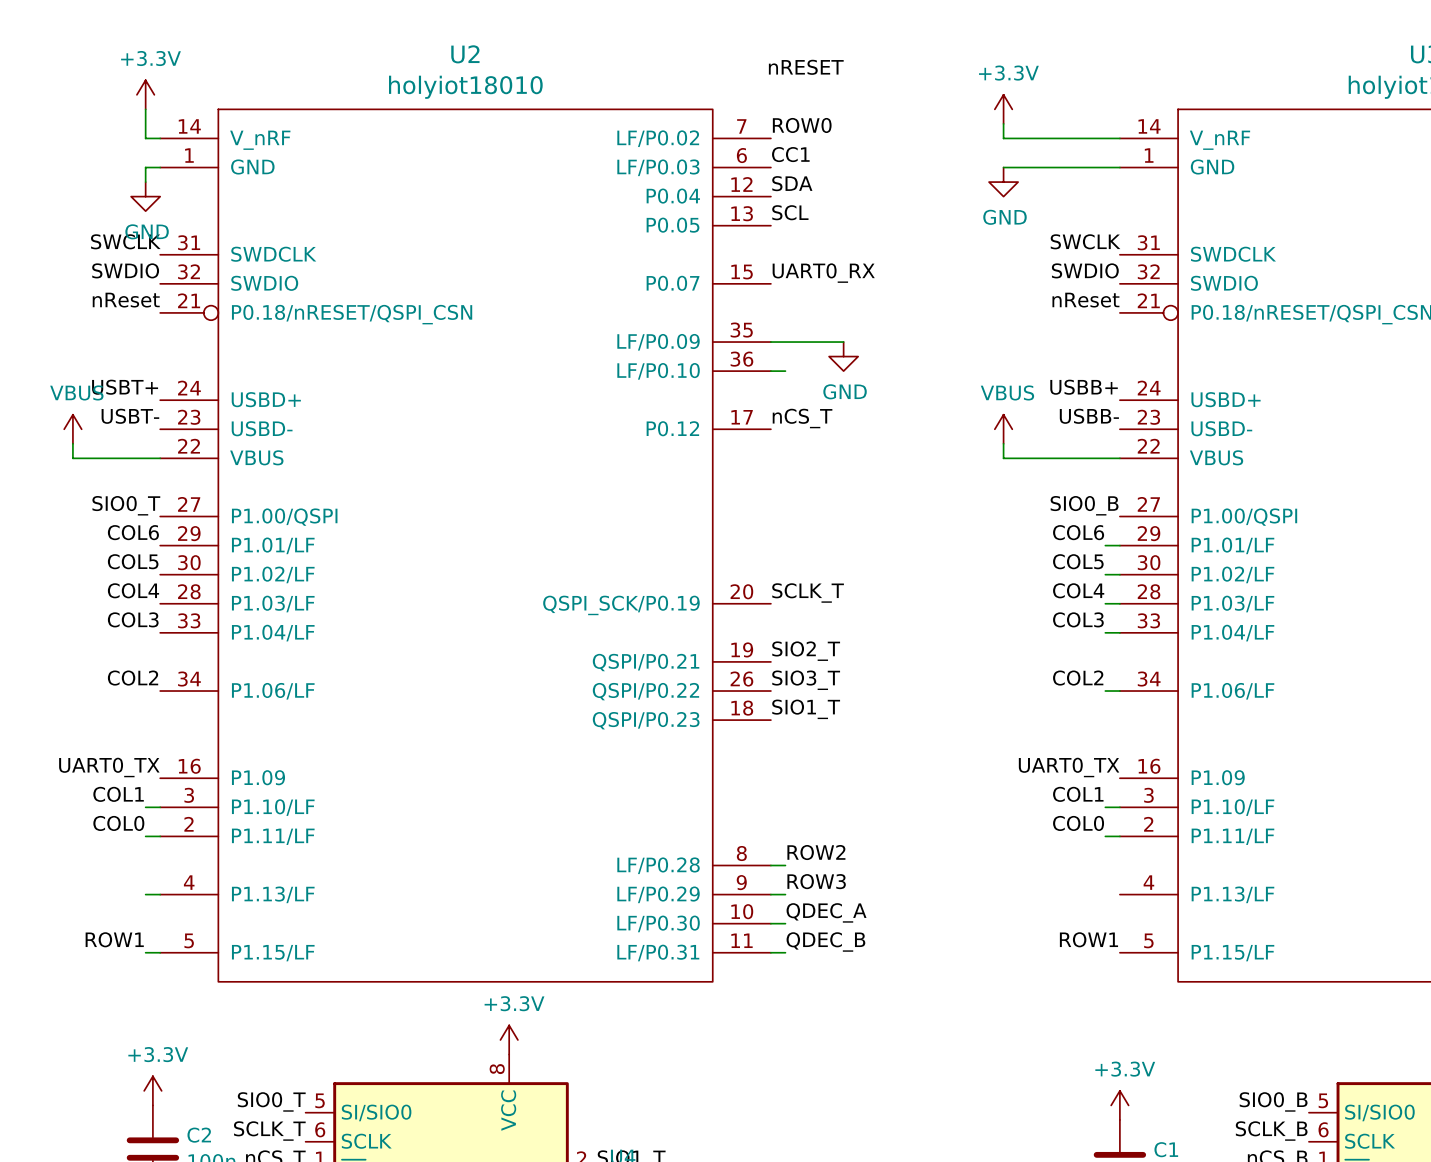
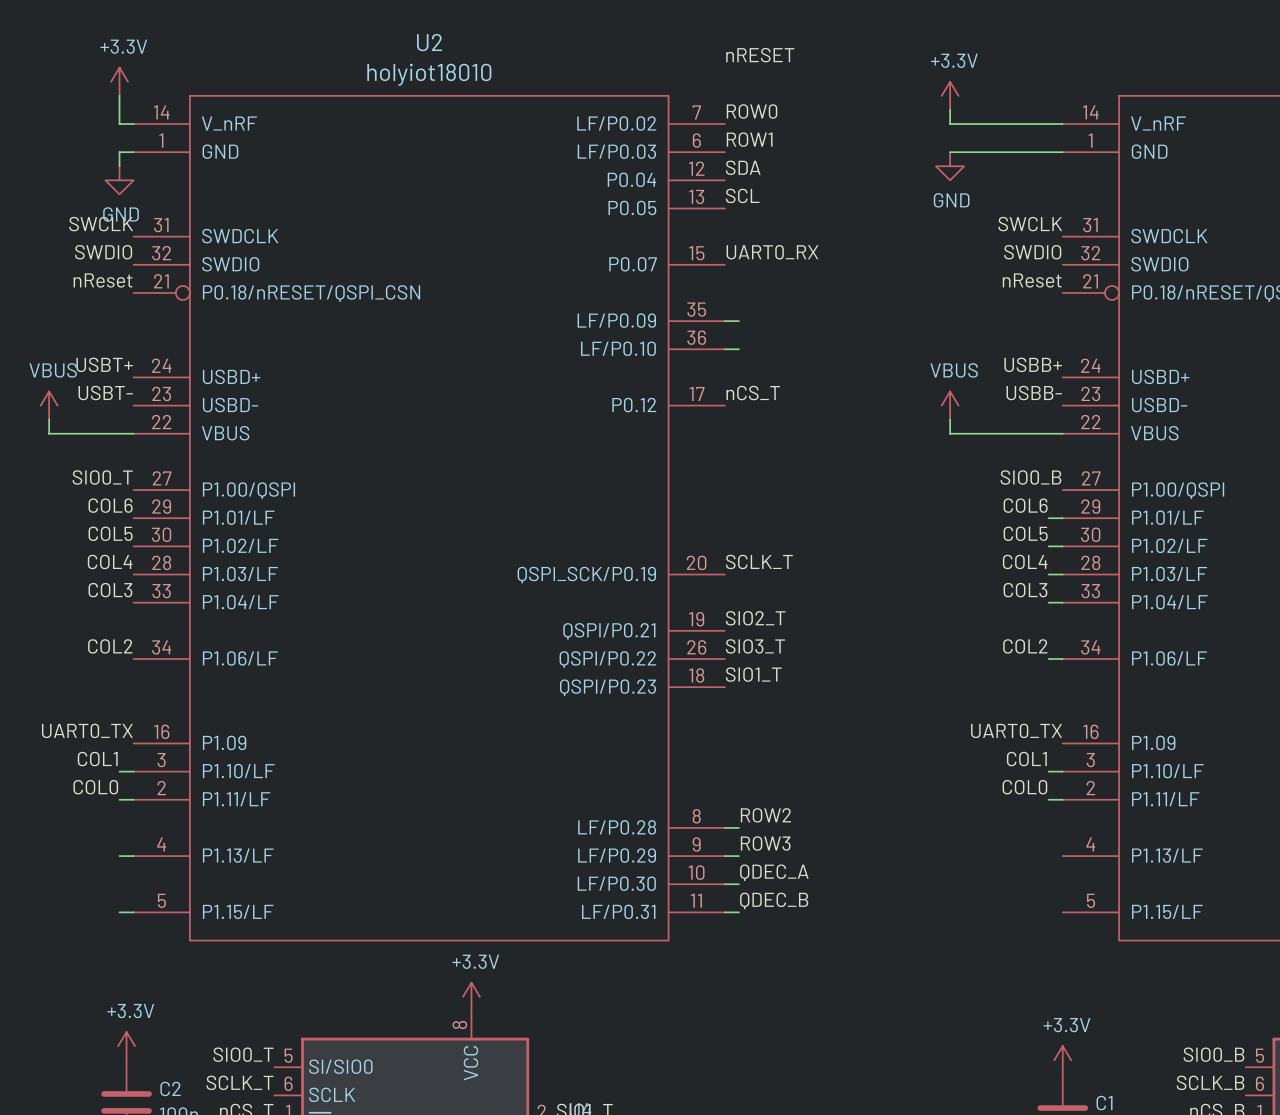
label: CC1 (790, 154) -> ROW1 (749, 139)
wire: (785, 342) (843, 342) -> none
power symbol: GND (843, 356) -> none
label: ROW1 (114, 939) -> none
label: ROW1 (1088, 939) -> none

